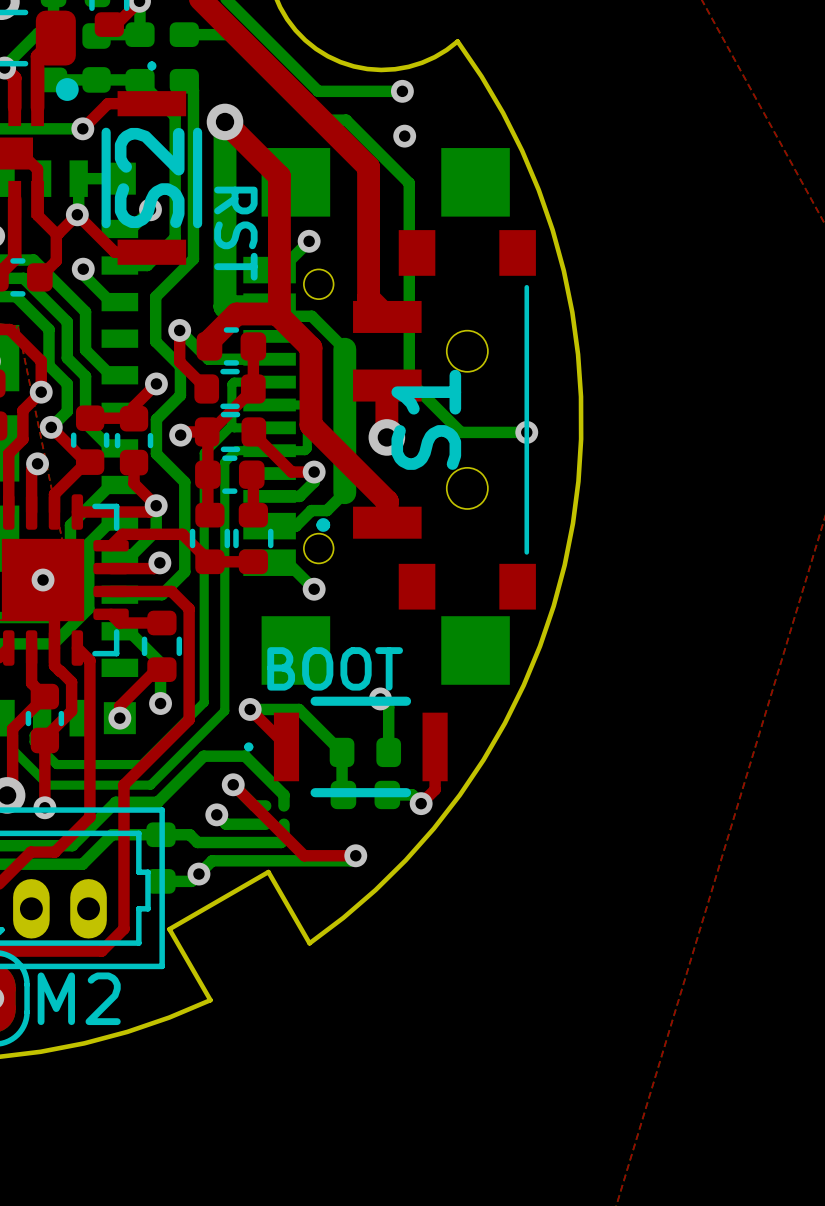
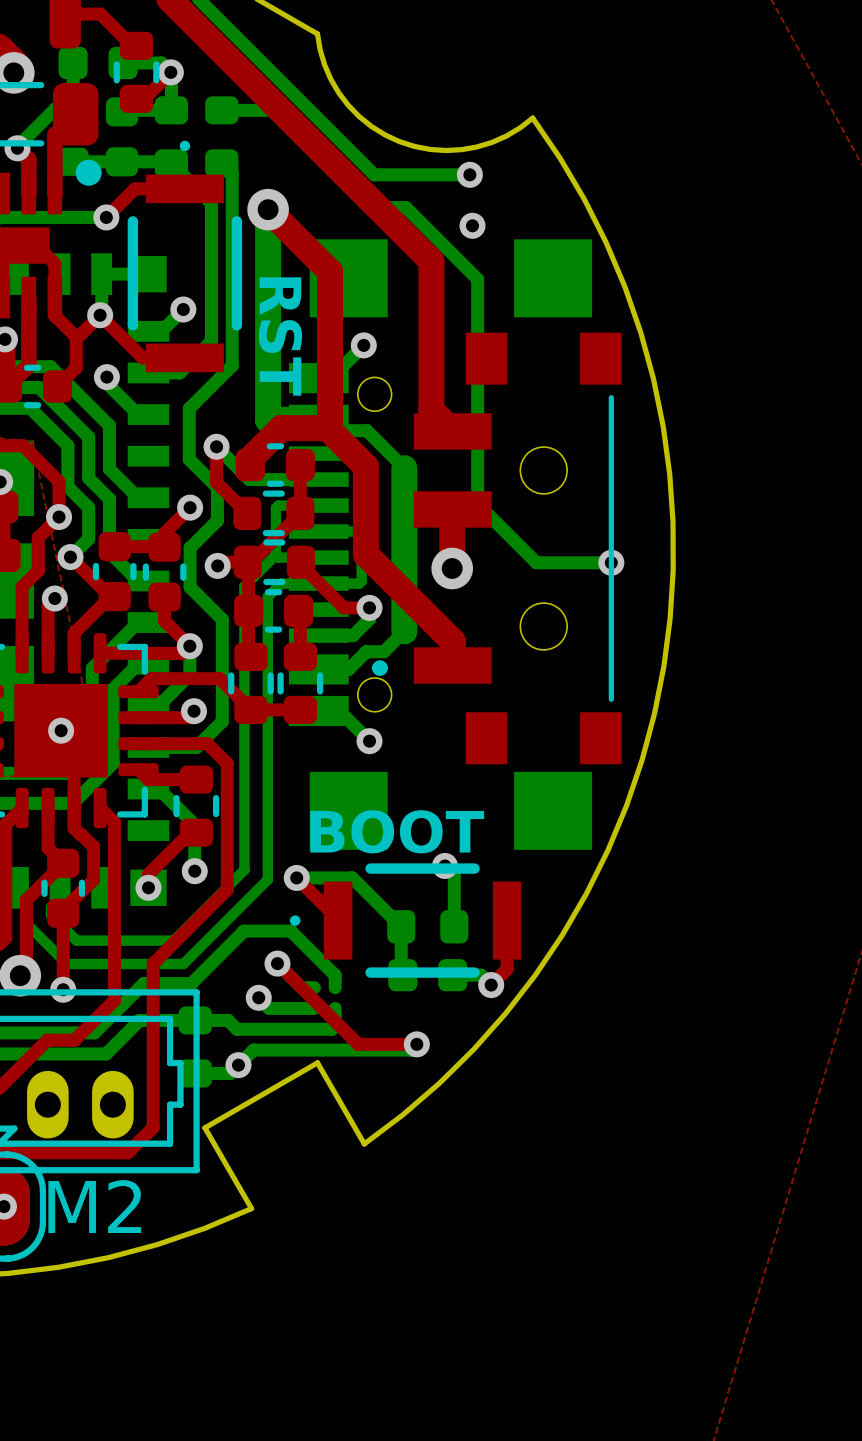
S2 name: S2 (149, 177) -> none
S1 name: S1 (426, 419) -> none

